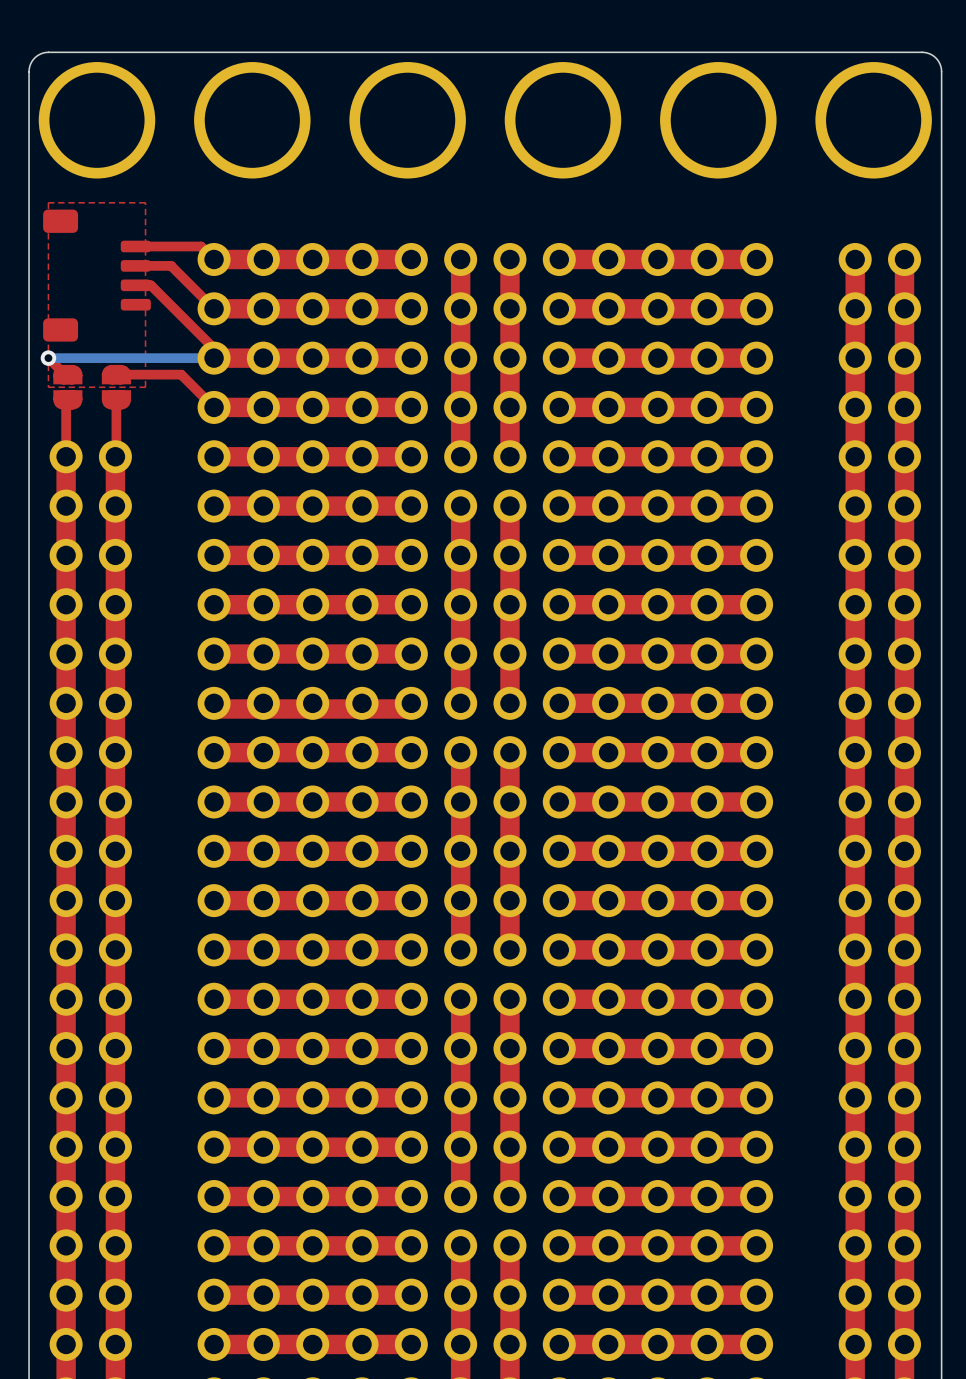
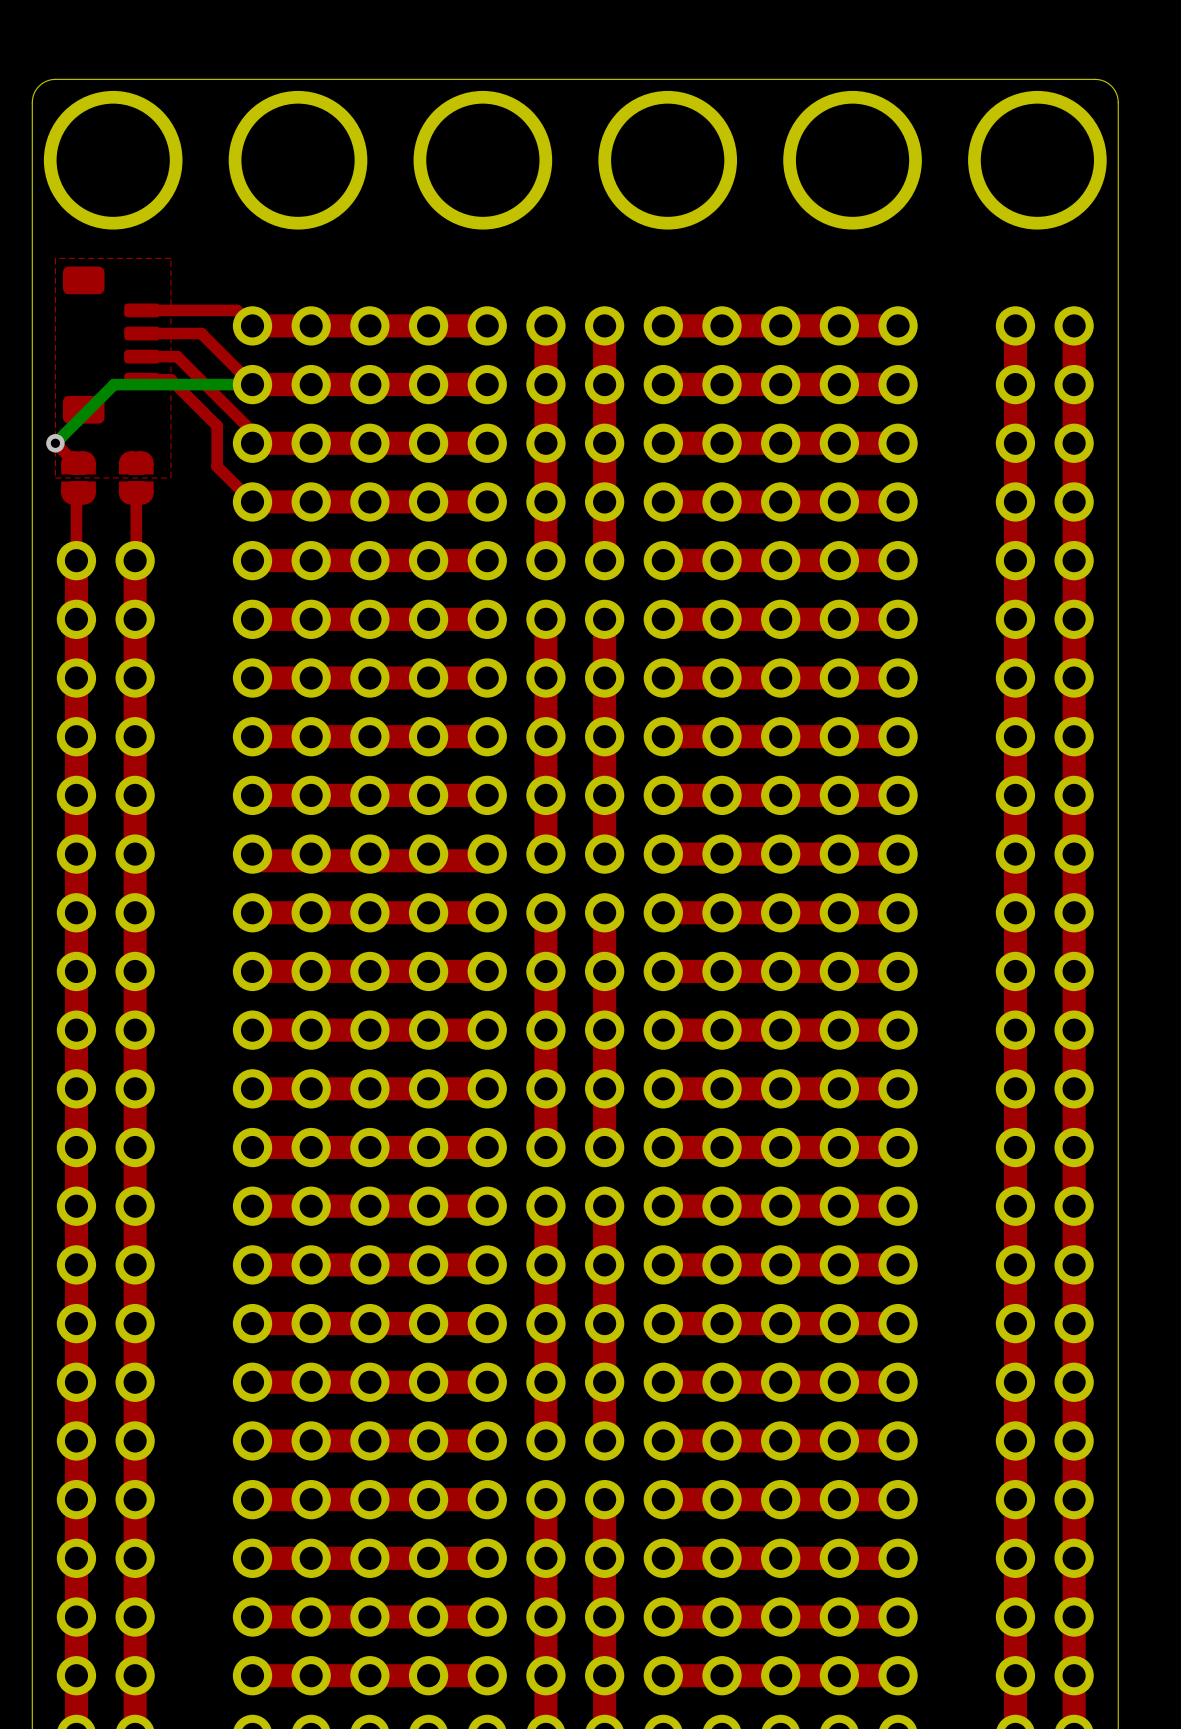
part footprint: [43, 209, 151, 342] -> [62, 266, 160, 424]
bottom track: (214, 358) (48, 358) -> (252, 384) (114, 384) (55, 443)
top track: (116, 374) (181, 374) (184, 377) -> (142, 379) (170, 379) (217, 425) (217, 466)

